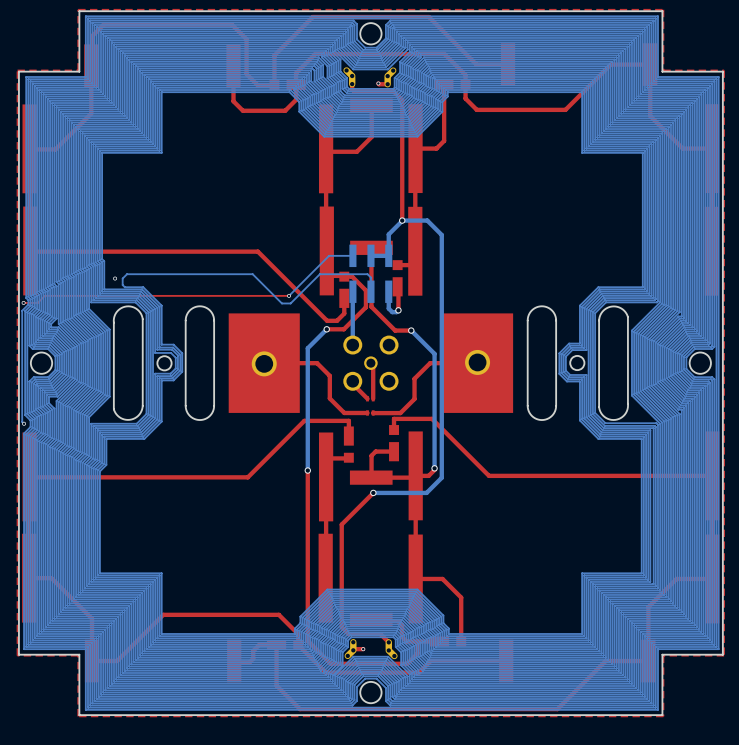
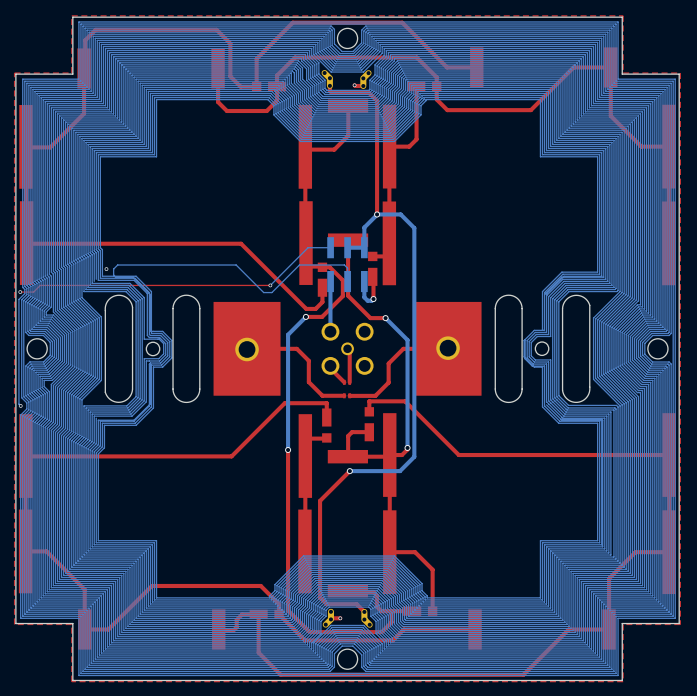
bottom track: (104, 289) (142, 289) (159, 306) (159, 347) (173, 347) (180, 354) (180, 370) -> (544, 294) (562, 274) (599, 274) (599, 154) (542, 154) (542, 97) (424, 97) (418, 104) (418, 113) (393, 139) (301, 139) (275, 113) (275, 104) (268, 97) (154, 97) (154, 154) (98, 154) (98, 248) (100, 250) (100, 278) (135, 278) (149, 292) (149, 334) (160, 335) (167, 342) (167, 355)
bottom track: (102, 291) (141, 291) (157, 307) (157, 349) (172, 349) (177, 357) -> (546, 295) (563, 276) (601, 276) (601, 152) (544, 152) (544, 95) (422, 95) (422, 98) (416, 103) (416, 112) (392, 137) (302, 137) (278, 112) (278, 103) (269, 95) (152, 95) (152, 152) (96, 152) (96, 249) (98, 251) (98, 280) (134, 280) (147, 293) (147, 335) (149, 337) (159, 337) (165, 343)
bottom track: none -> (542, 330) (542, 291) (561, 272) (597, 272) (597, 156) (540, 156) (540, 99) (426, 99) (420, 105) (420, 114) (394, 141) (300, 141) (273, 114) (273, 105) (267, 99) (156, 99) (156, 156) (100, 156) (100, 247) (102, 249) (102, 276) (136, 276) (151, 291) (151, 333) (161, 333) (169, 341)
bottom track: (173, 344) (182, 355) -> (161, 331) (171, 340) (171, 357) (162, 367) (153, 367) (153, 407) (136, 425) (104, 425) (104, 447) (98, 453) (98, 540) (156, 540) (156, 597) (269, 597) (274, 590) (274, 584) (303, 556) (394, 556) (422, 583) (422, 590) (427, 597) (540, 597) (540, 540) (597, 540) (597, 423) (558, 423) (542, 406) (542, 367) (534, 367) (524, 356) (525, 339)
bottom track: (161, 378) (159, 378) (159, 420) (143, 436) (104, 436) -> (150, 363) (149, 405) (134, 421) (100, 421) (100, 445) (94, 451) (94, 544) (152, 544) (152, 601) (273, 601) (273, 597) (279, 592) (279, 586) (305, 560) (392, 560) (417, 585) (417, 592) (423, 597) (423, 601) (544, 601) (544, 544) (601, 544) (601, 419) (560, 419)
bottom track: (579, 420) (582, 422) -> (544, 402) (544, 405) (559, 421) (599, 421) (599, 542) (542, 542) (542, 599) (425, 599) (425, 596) (419, 591) (419, 584) (393, 558) (304, 558) (277, 585) (277, 591) (271, 596) (271, 599) (154, 599) (154, 542) (96, 542) (96, 452) (102, 446) (102, 423) (135, 423) (151, 406) (151, 365)

